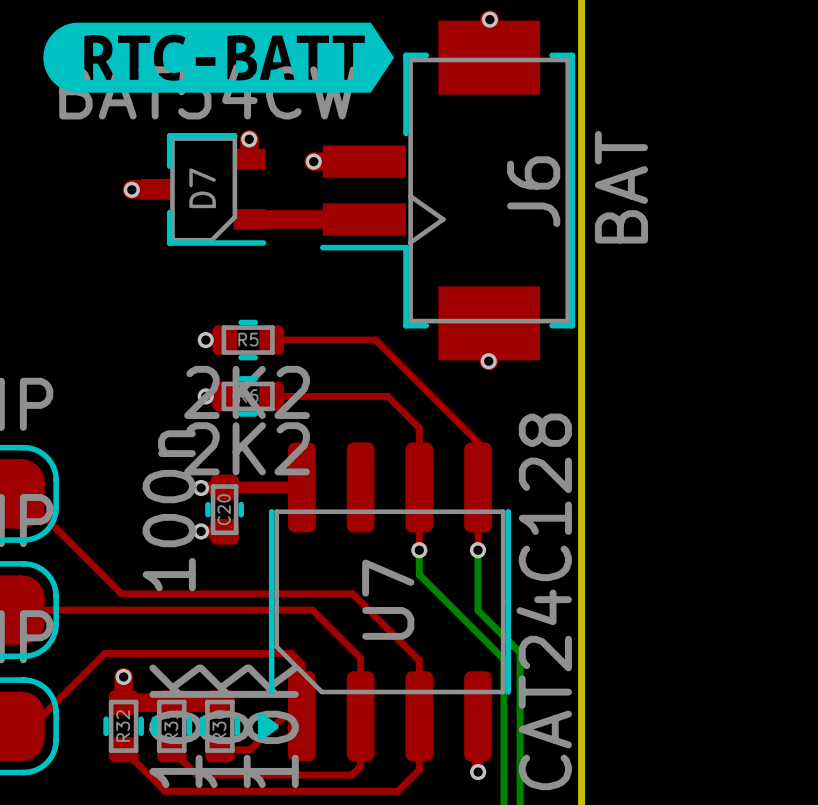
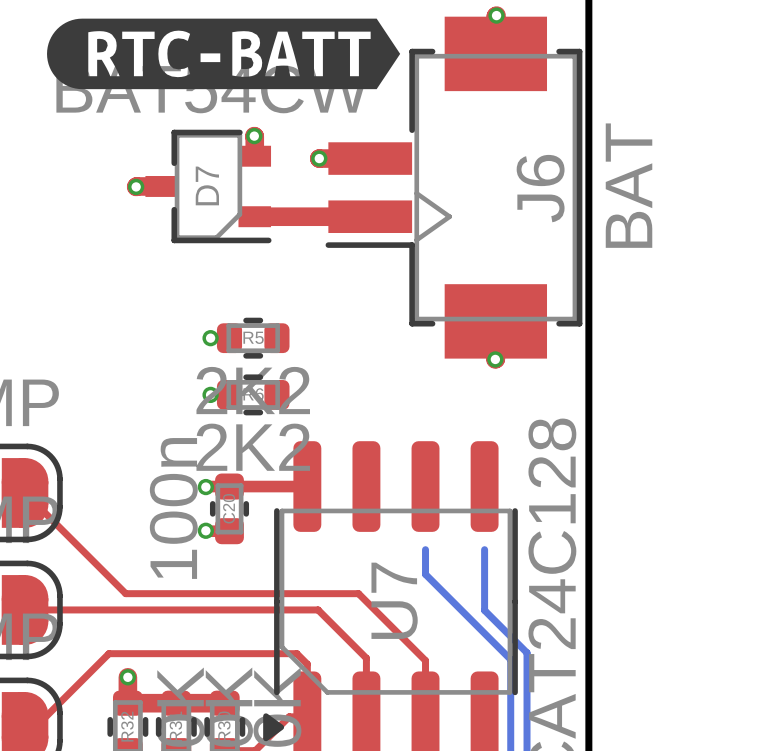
top track: (271, 340) (375, 340) (478, 442) (478, 550) -> none
top track: (271, 396) (387, 396) (419, 427) (419, 550) -> none
via: (419, 550) -> none
via: (478, 550) -> none

